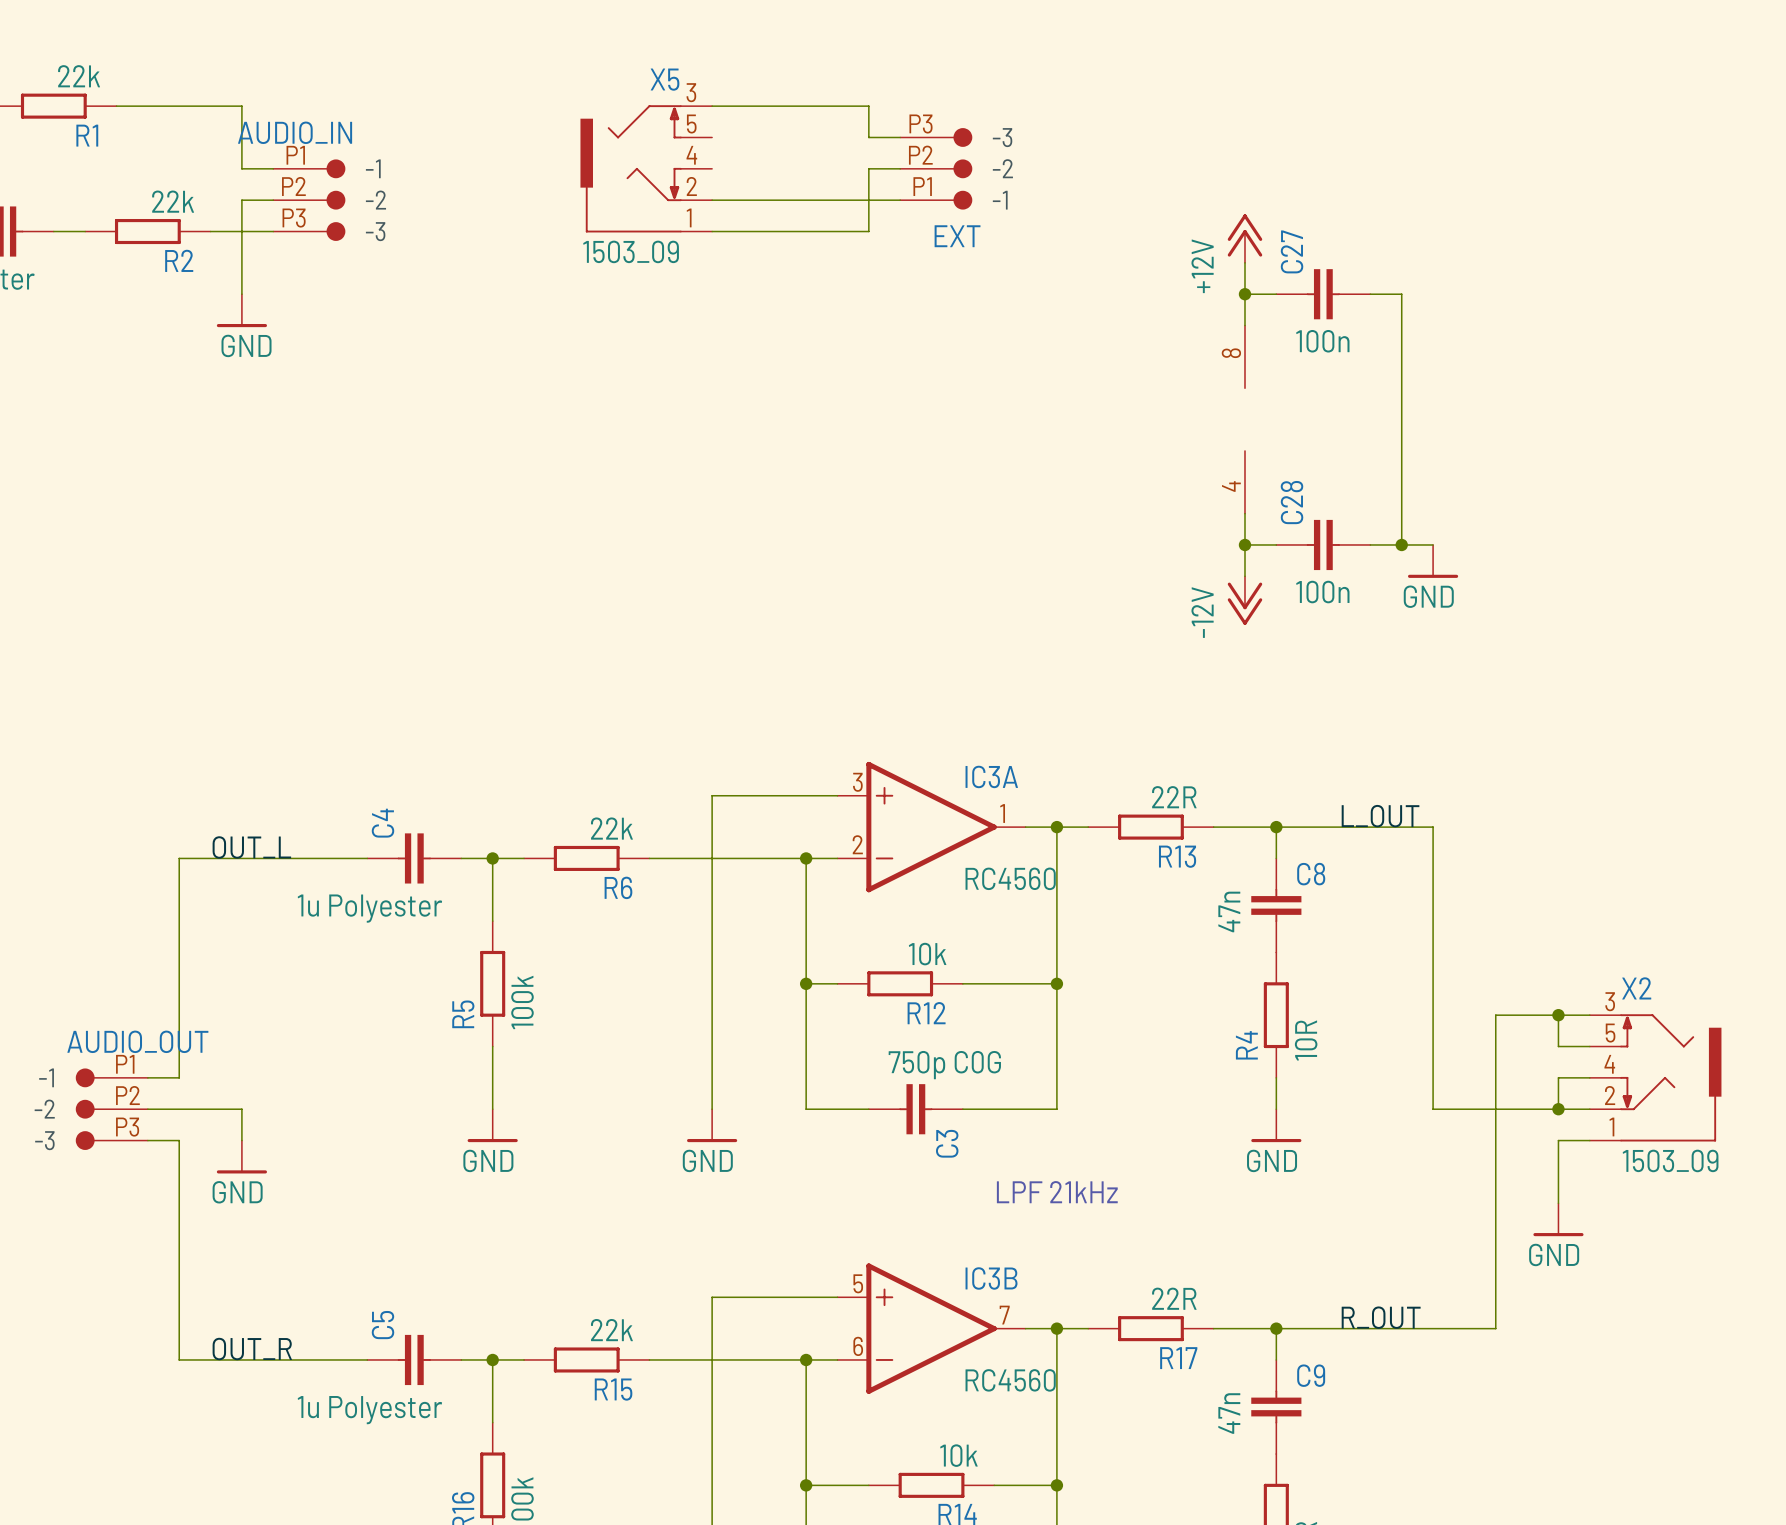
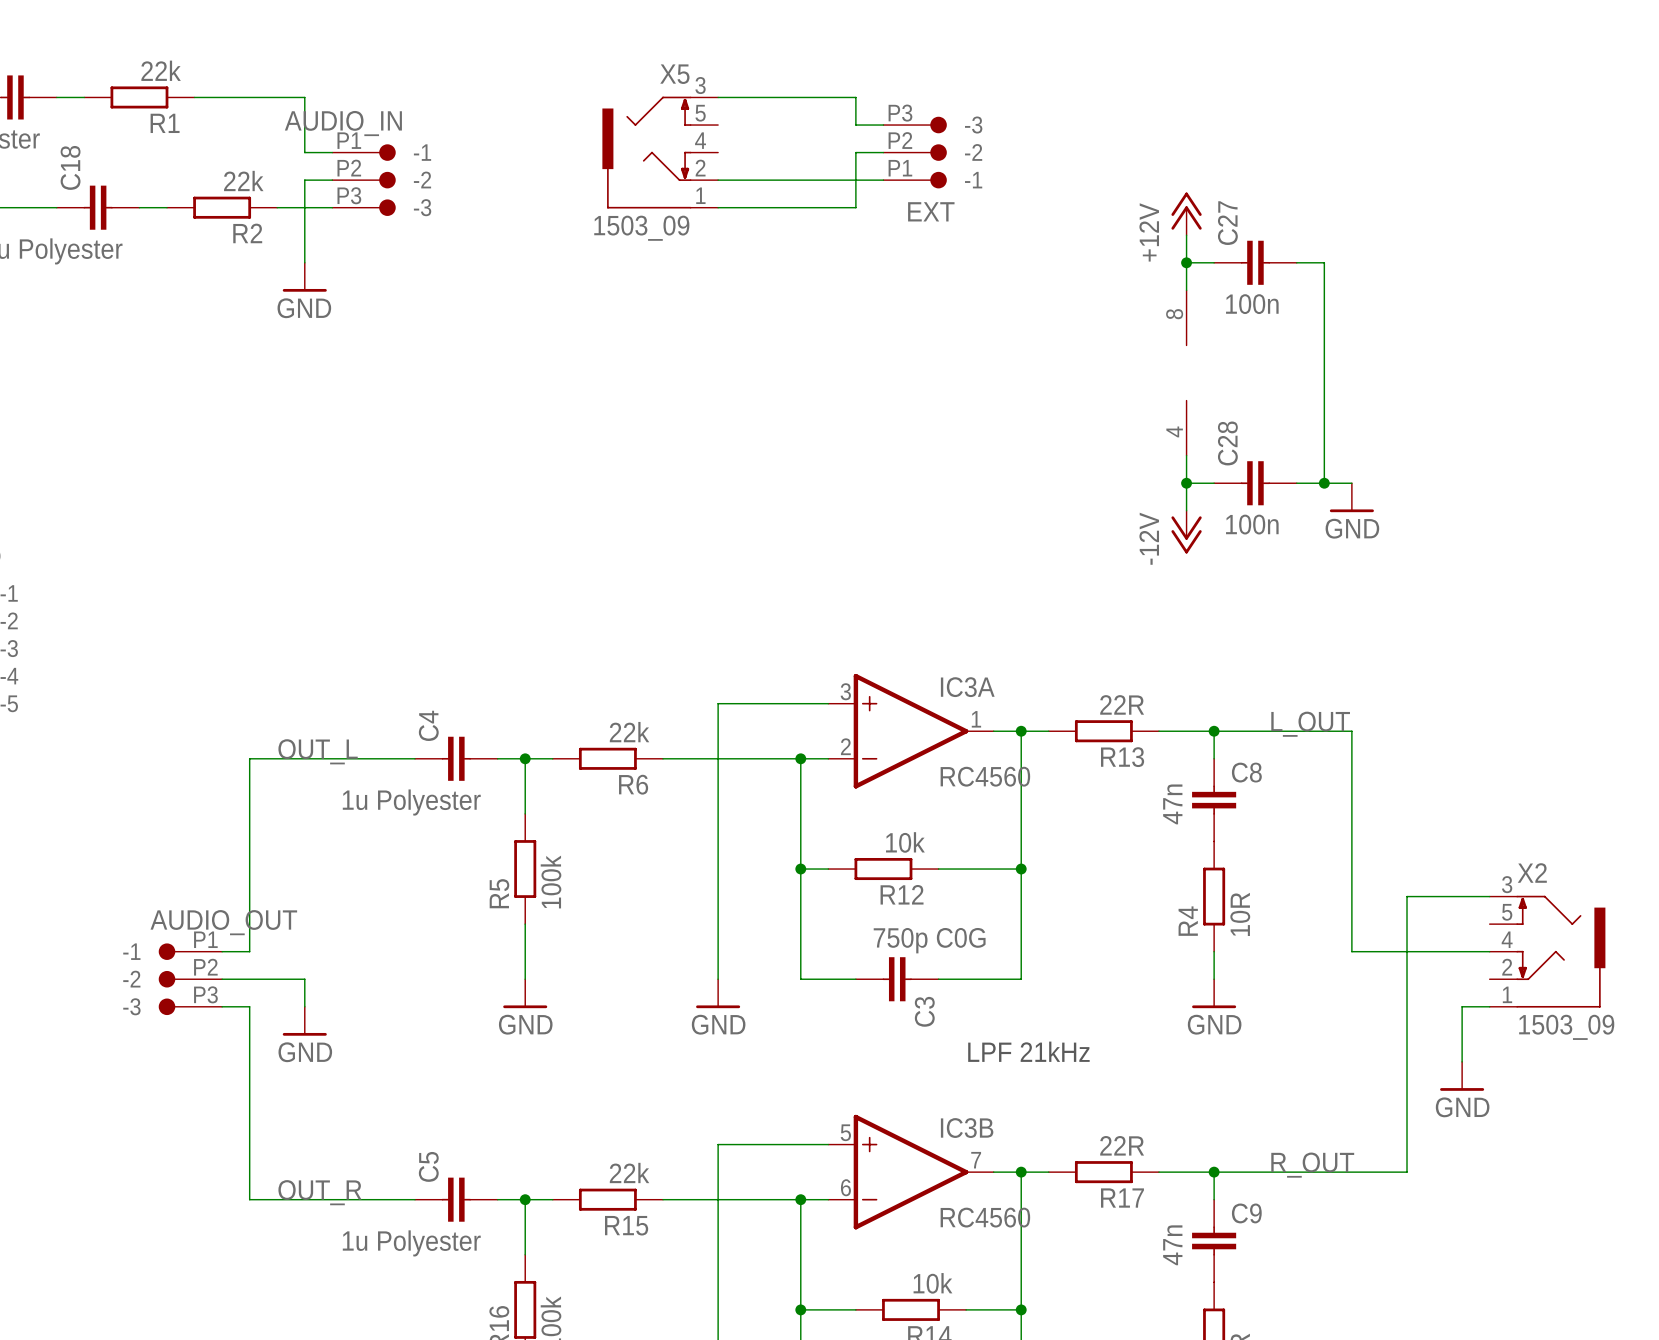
wire: (1558, 1015) (1558, 1046) (1589, 1046) -> none
junction: (1558, 1015) -> none
wire: (1433, 1077) (1433, 1109) (1589, 1109) -> (1351, 951) (1462, 951)
wire: (1558, 1077) (1558, 1109) -> none
junction: (1558, 1109) -> none

